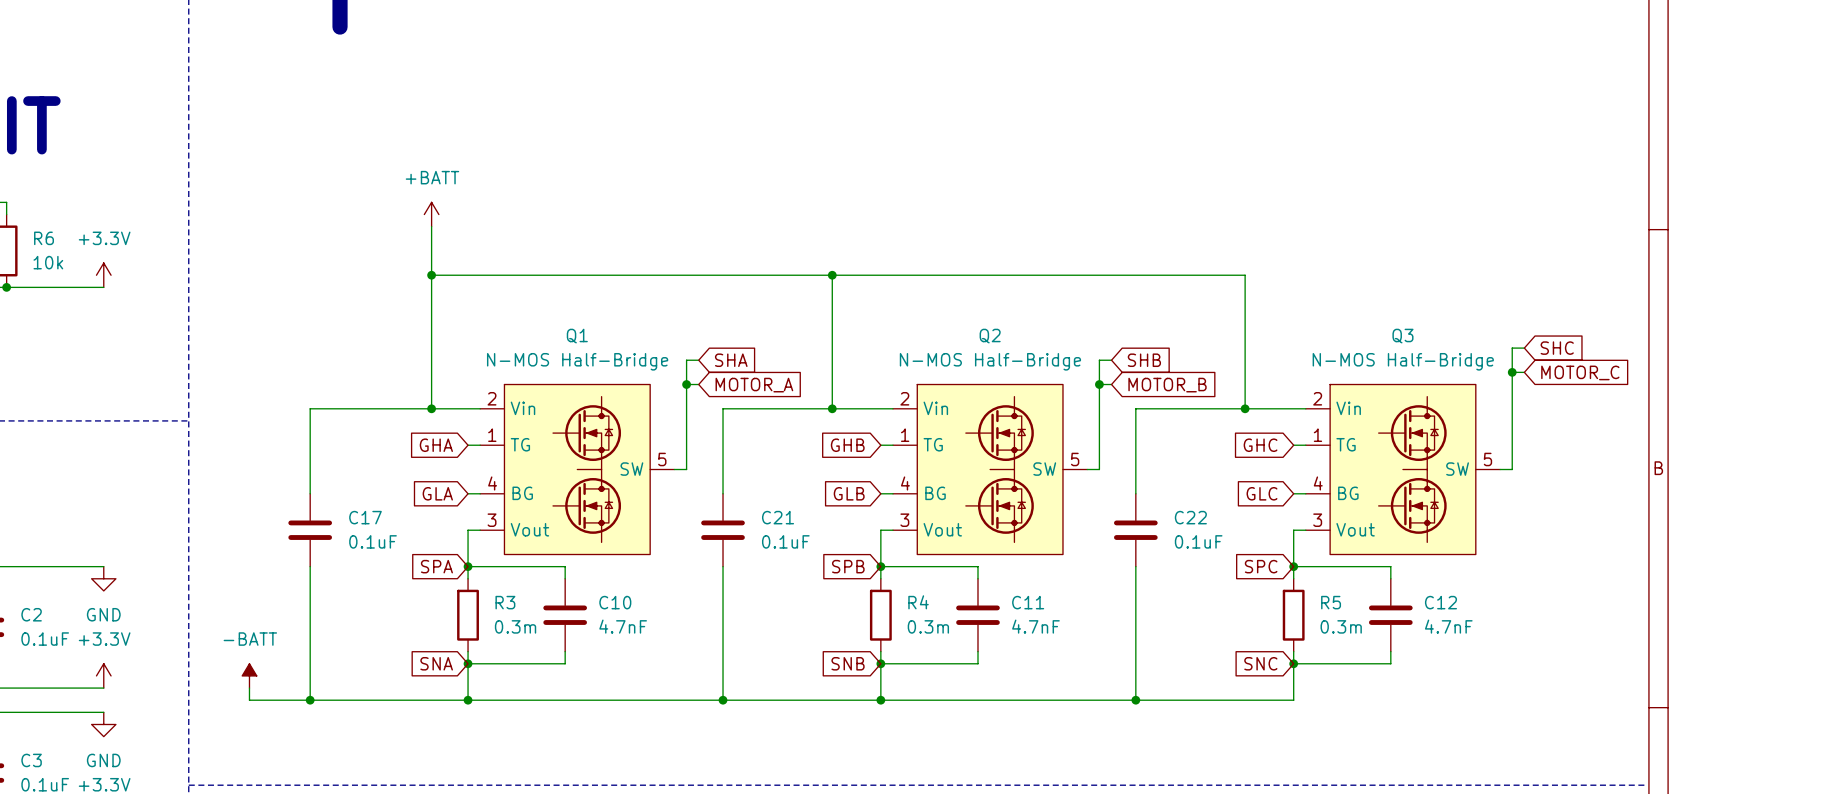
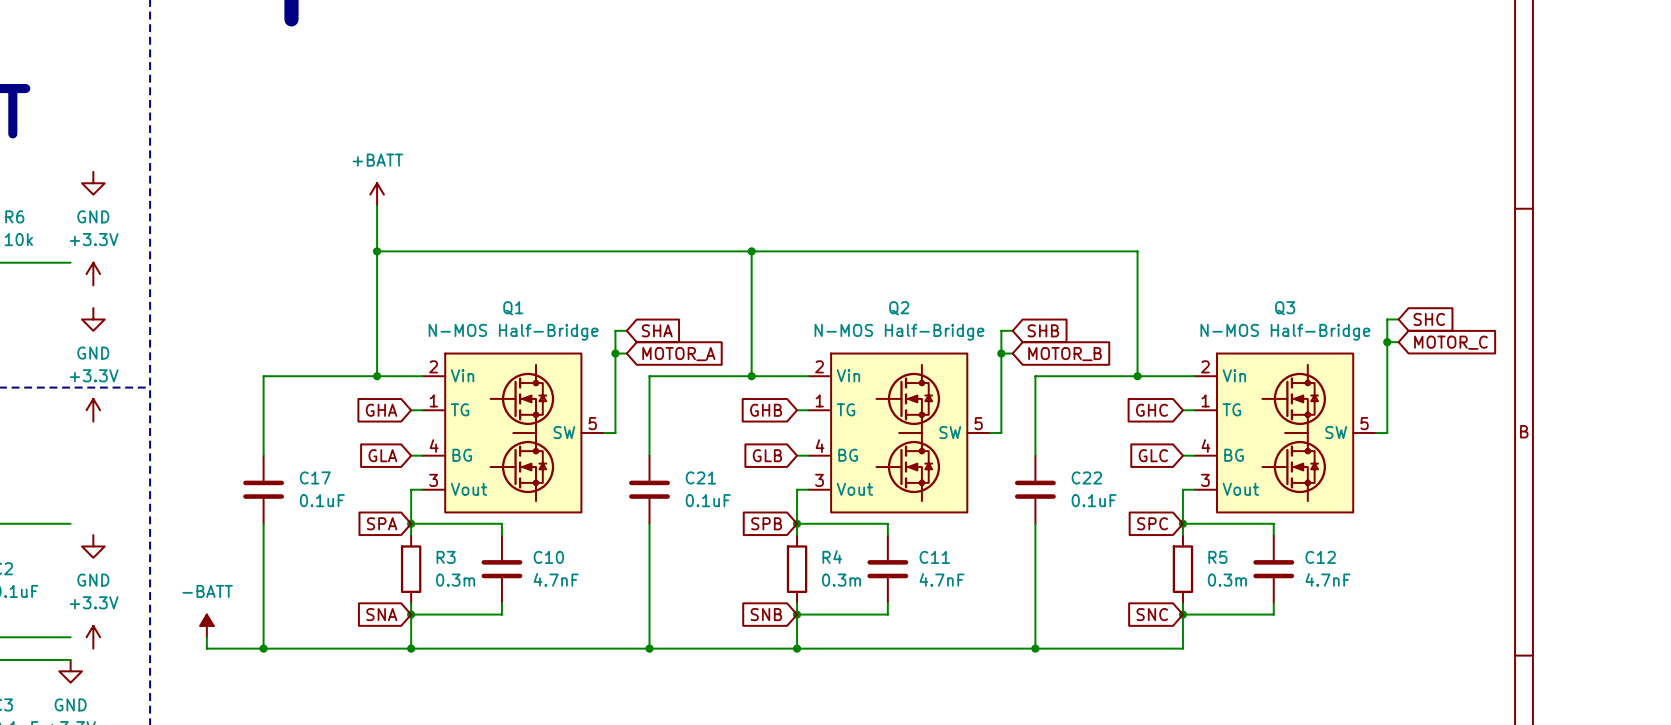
power symbol: none -> GND (93, 183)
power symbol position: +3.3V (103, 275) -> +3.3V (93, 274)
power symbol: none -> GND (93, 319)
power symbol: none -> +3.3V (93, 410)
power symbol position: GND (103, 578) -> GND (93, 546)
power symbol position: +3.3V (103, 675) -> +3.3V (93, 637)

